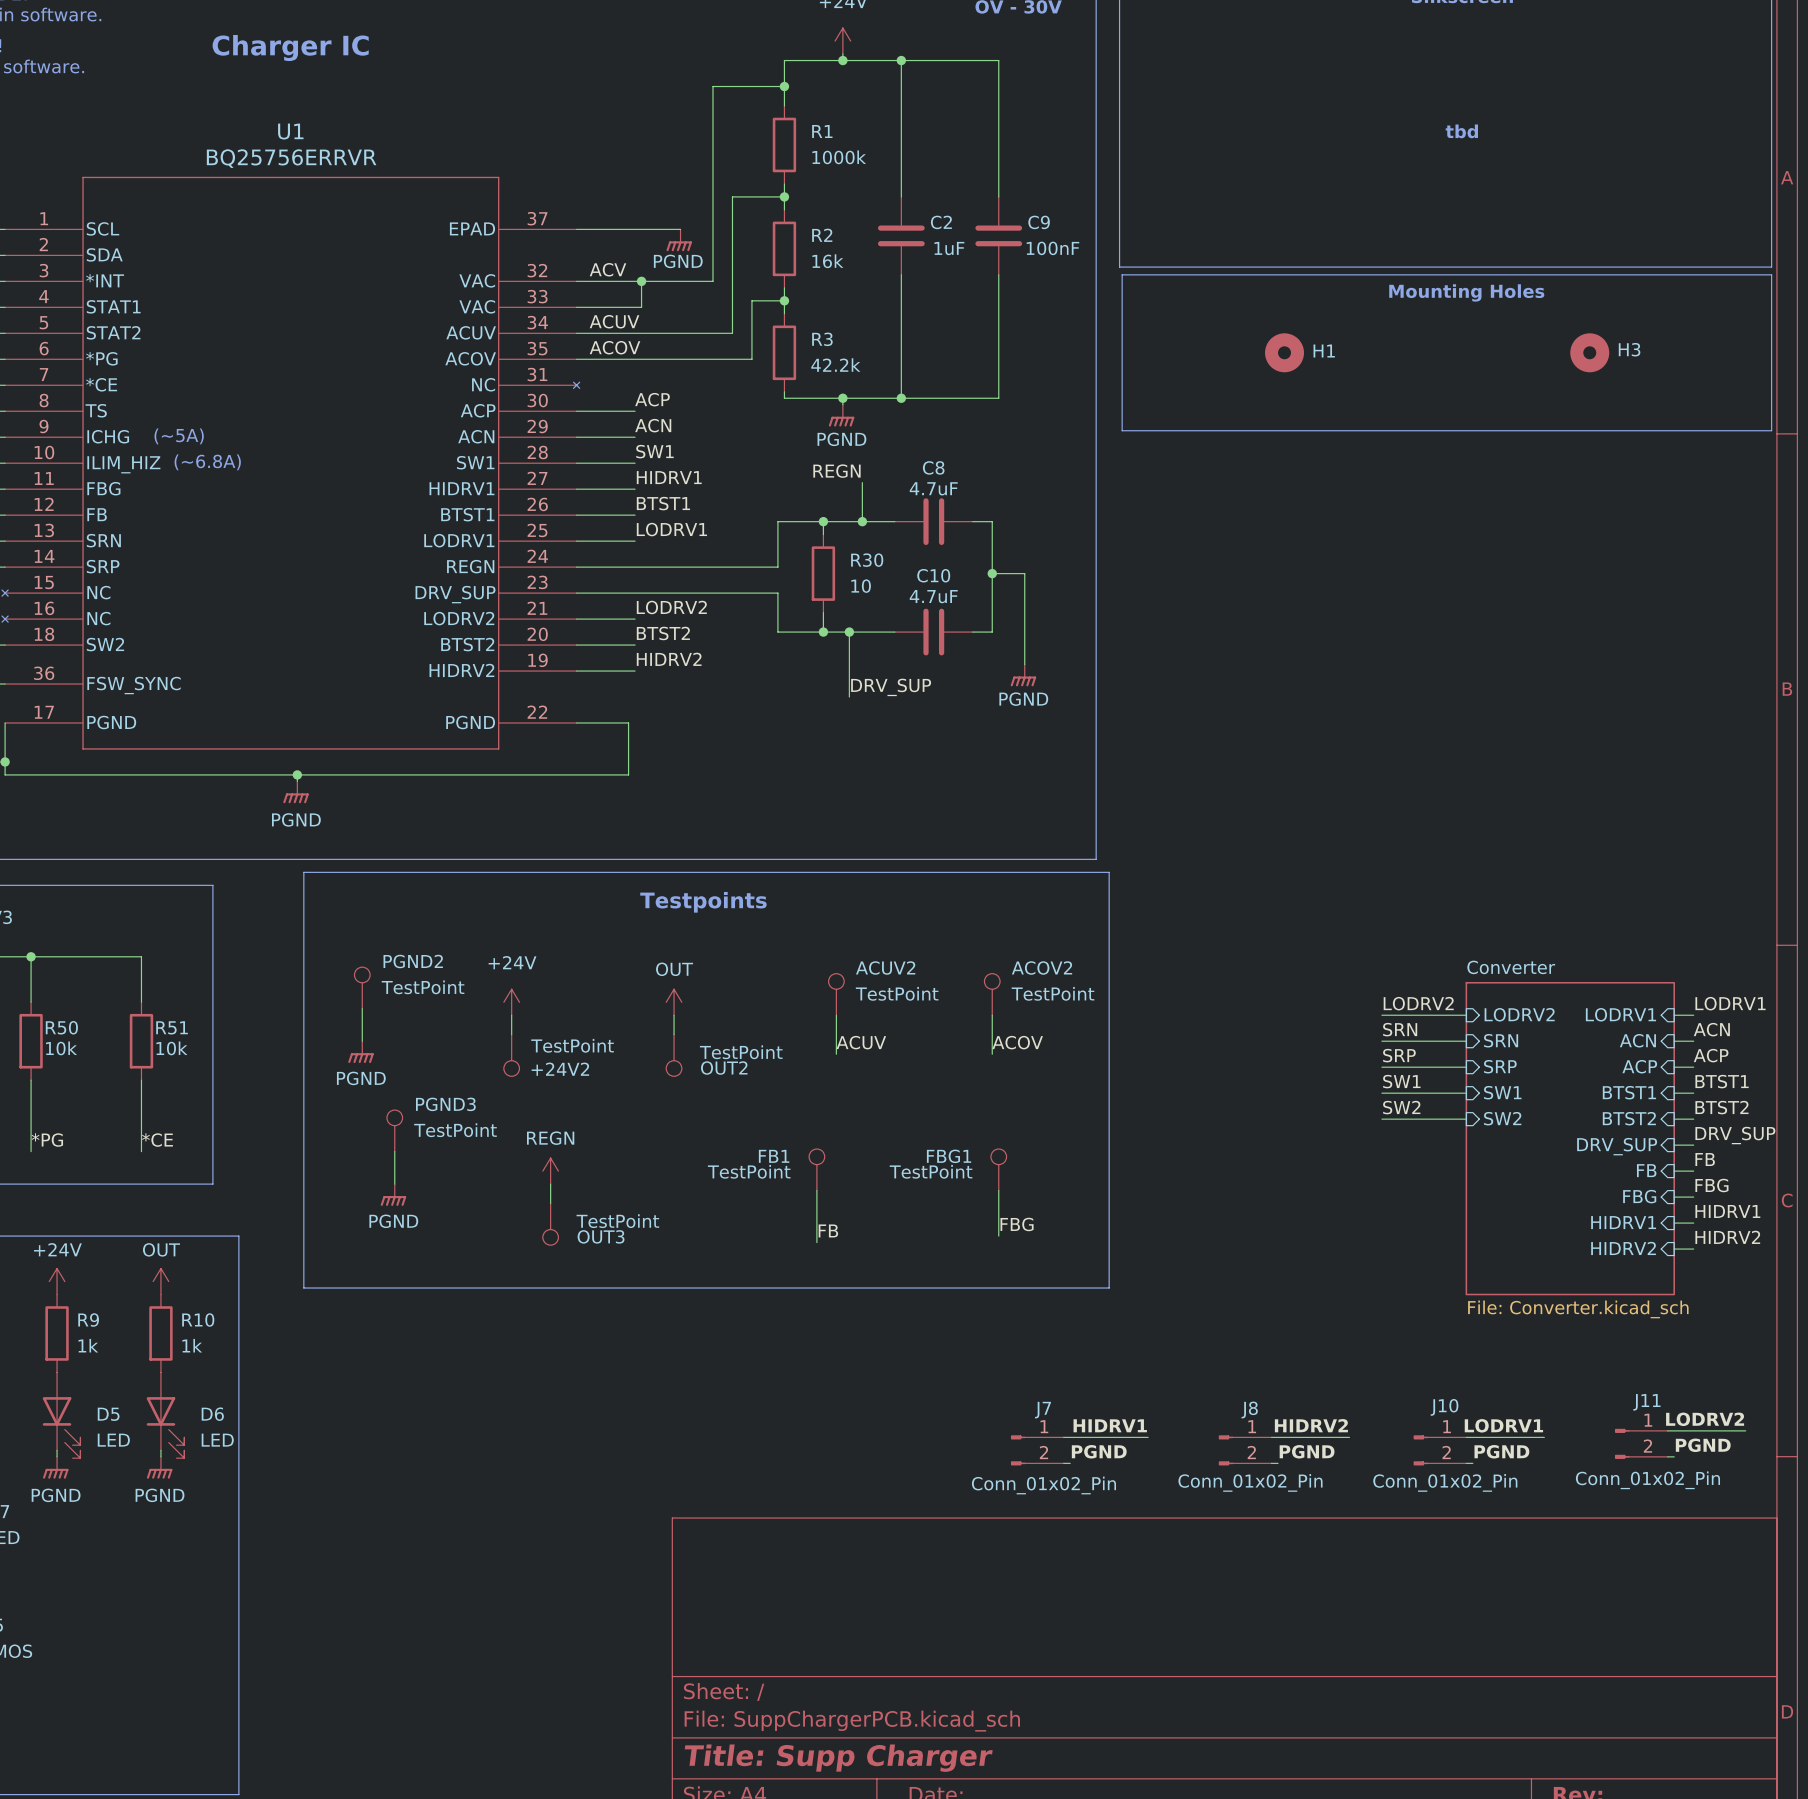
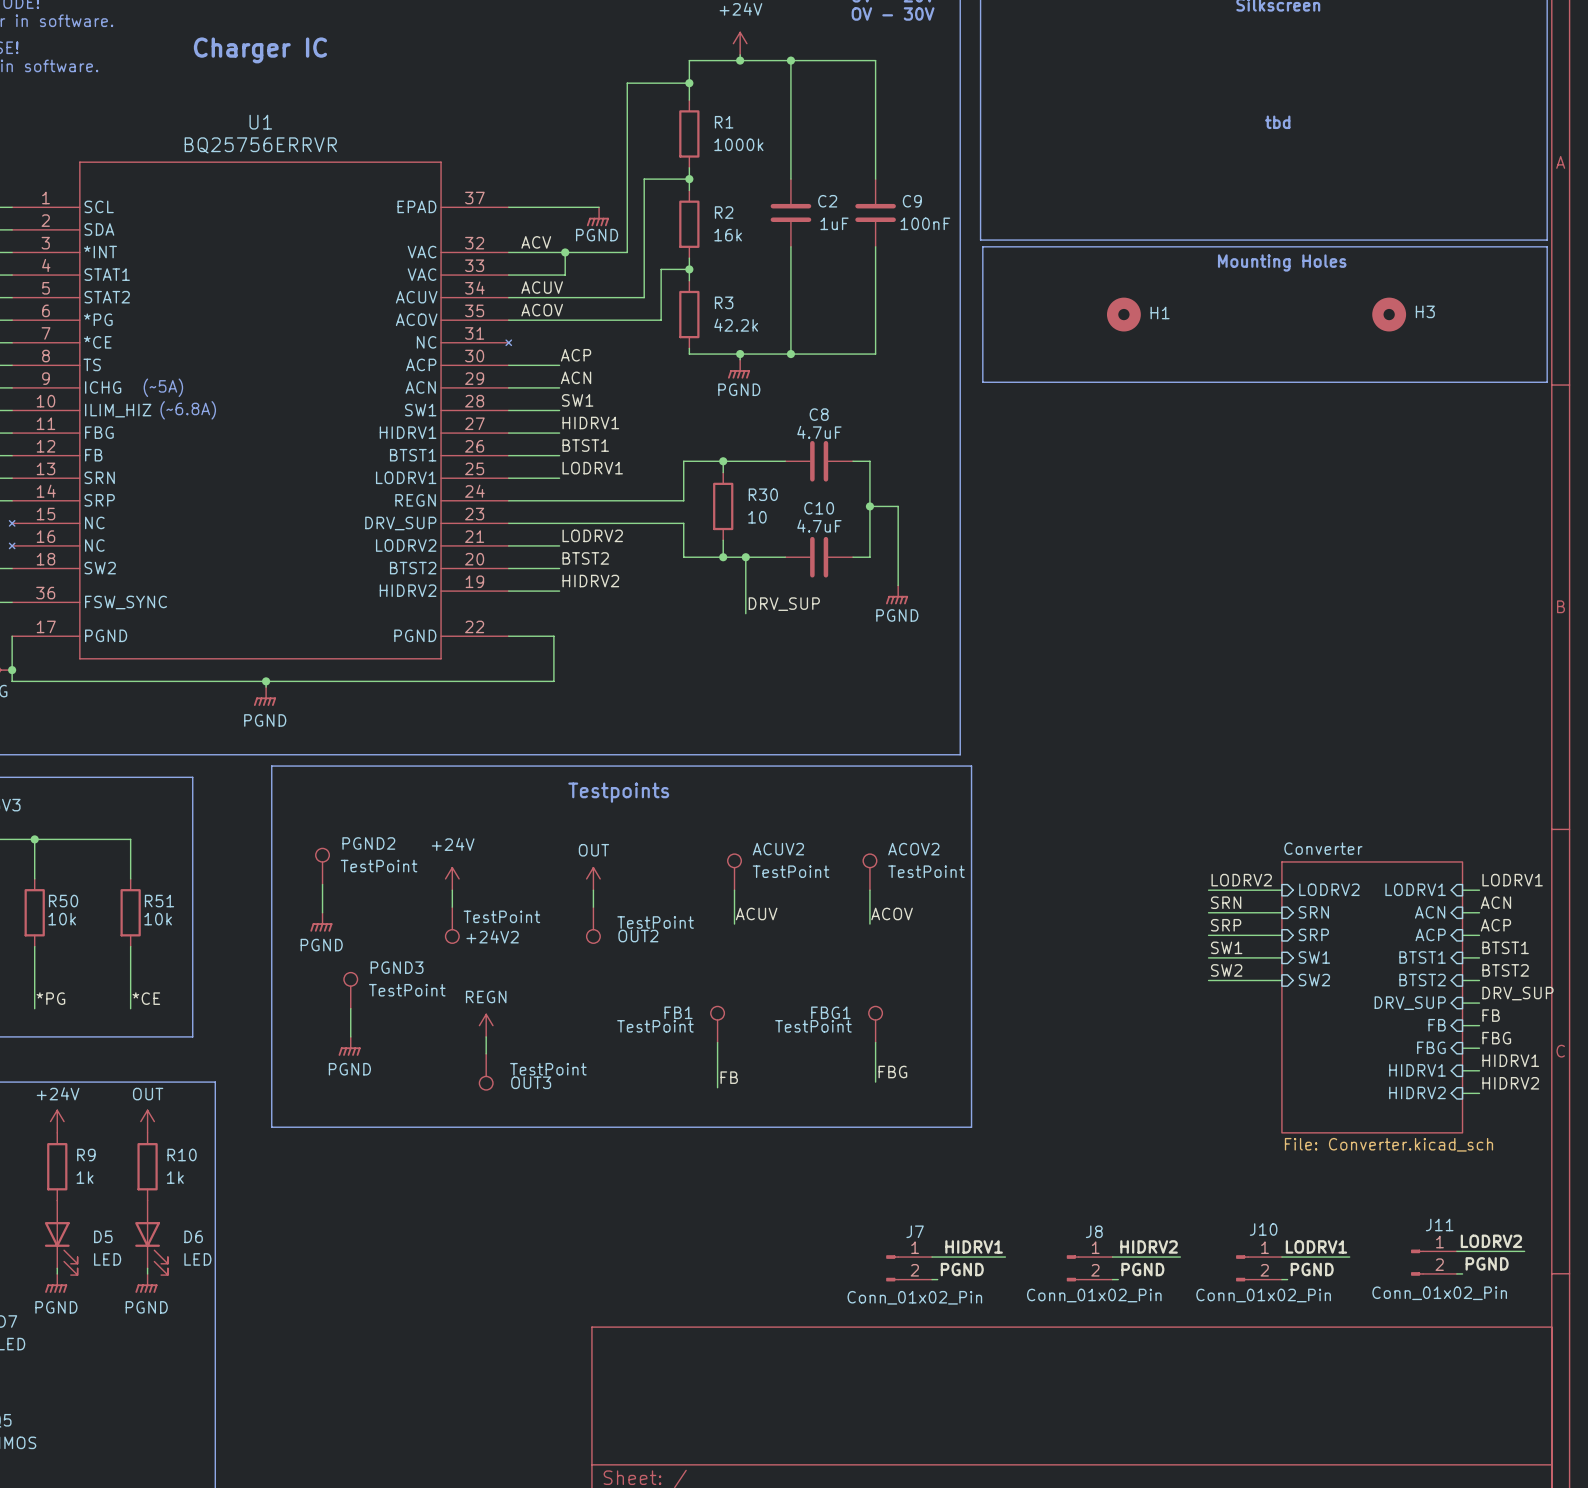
label: REGN (836, 471) -> none
wire: (862, 482) (862, 521) -> none
junction: (862, 521) -> none

